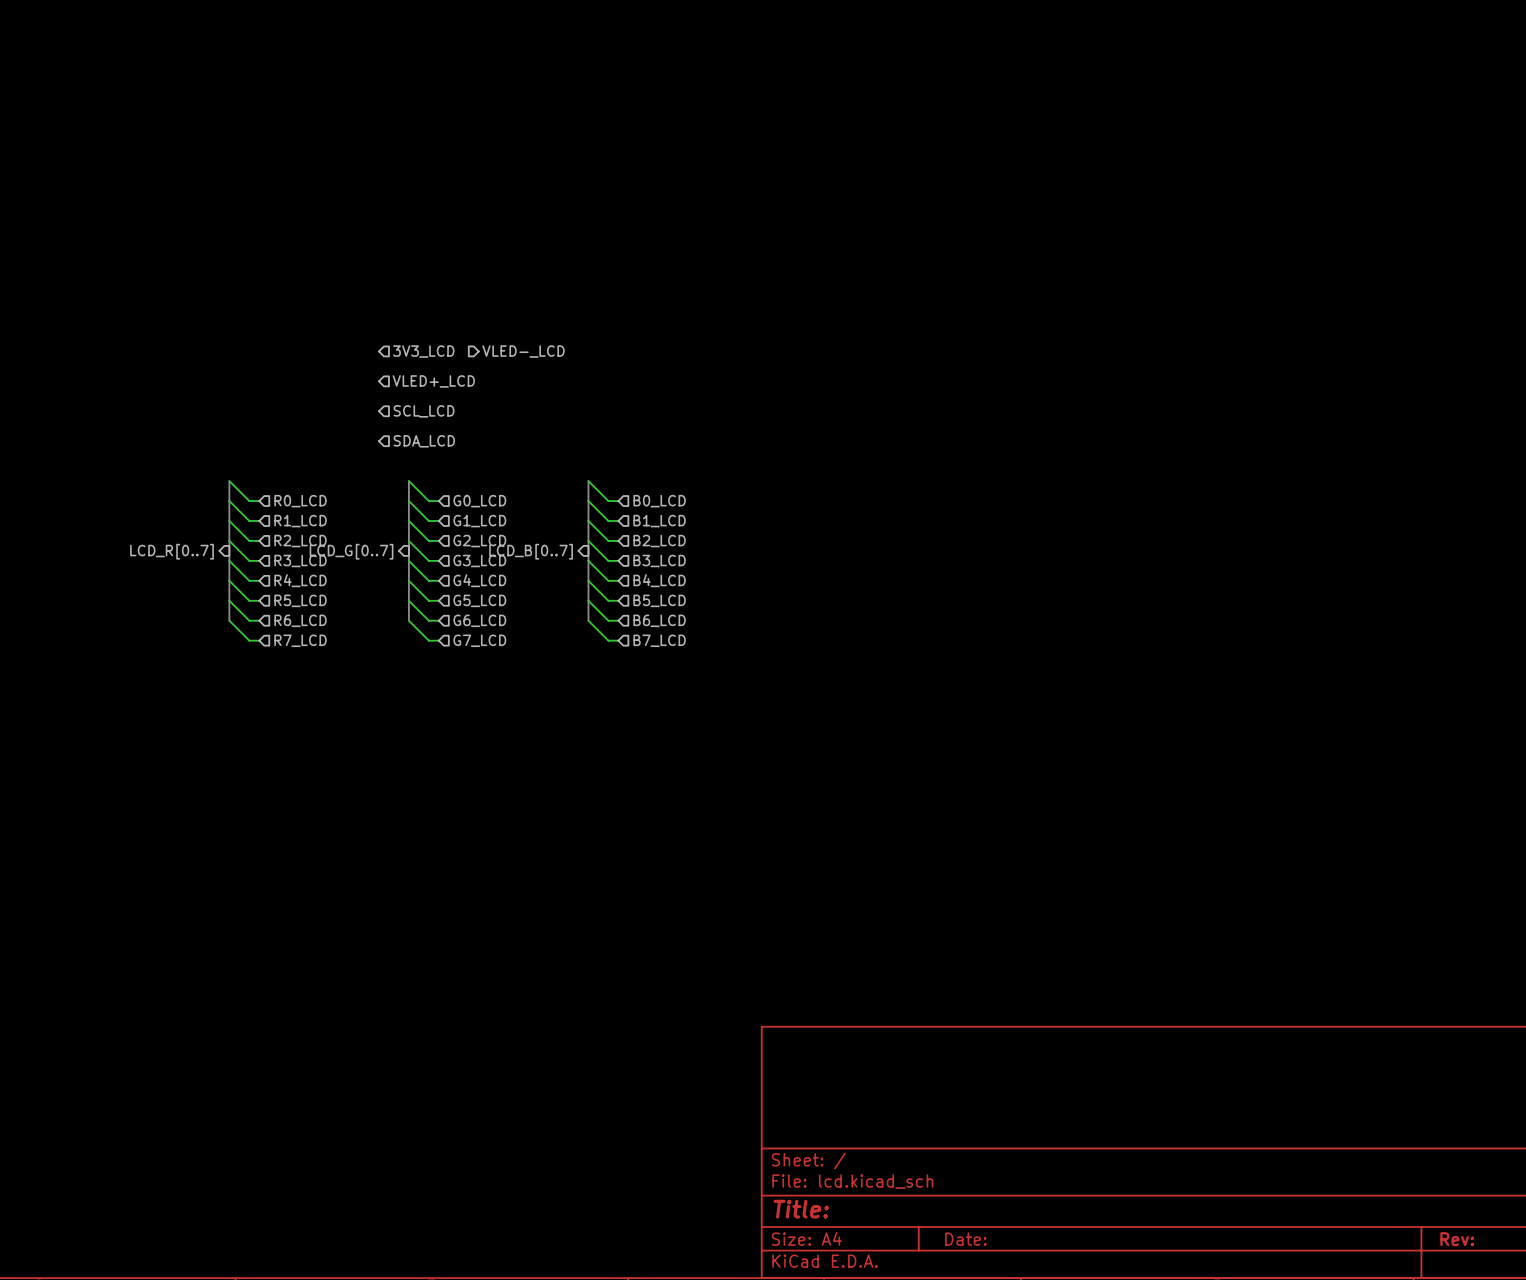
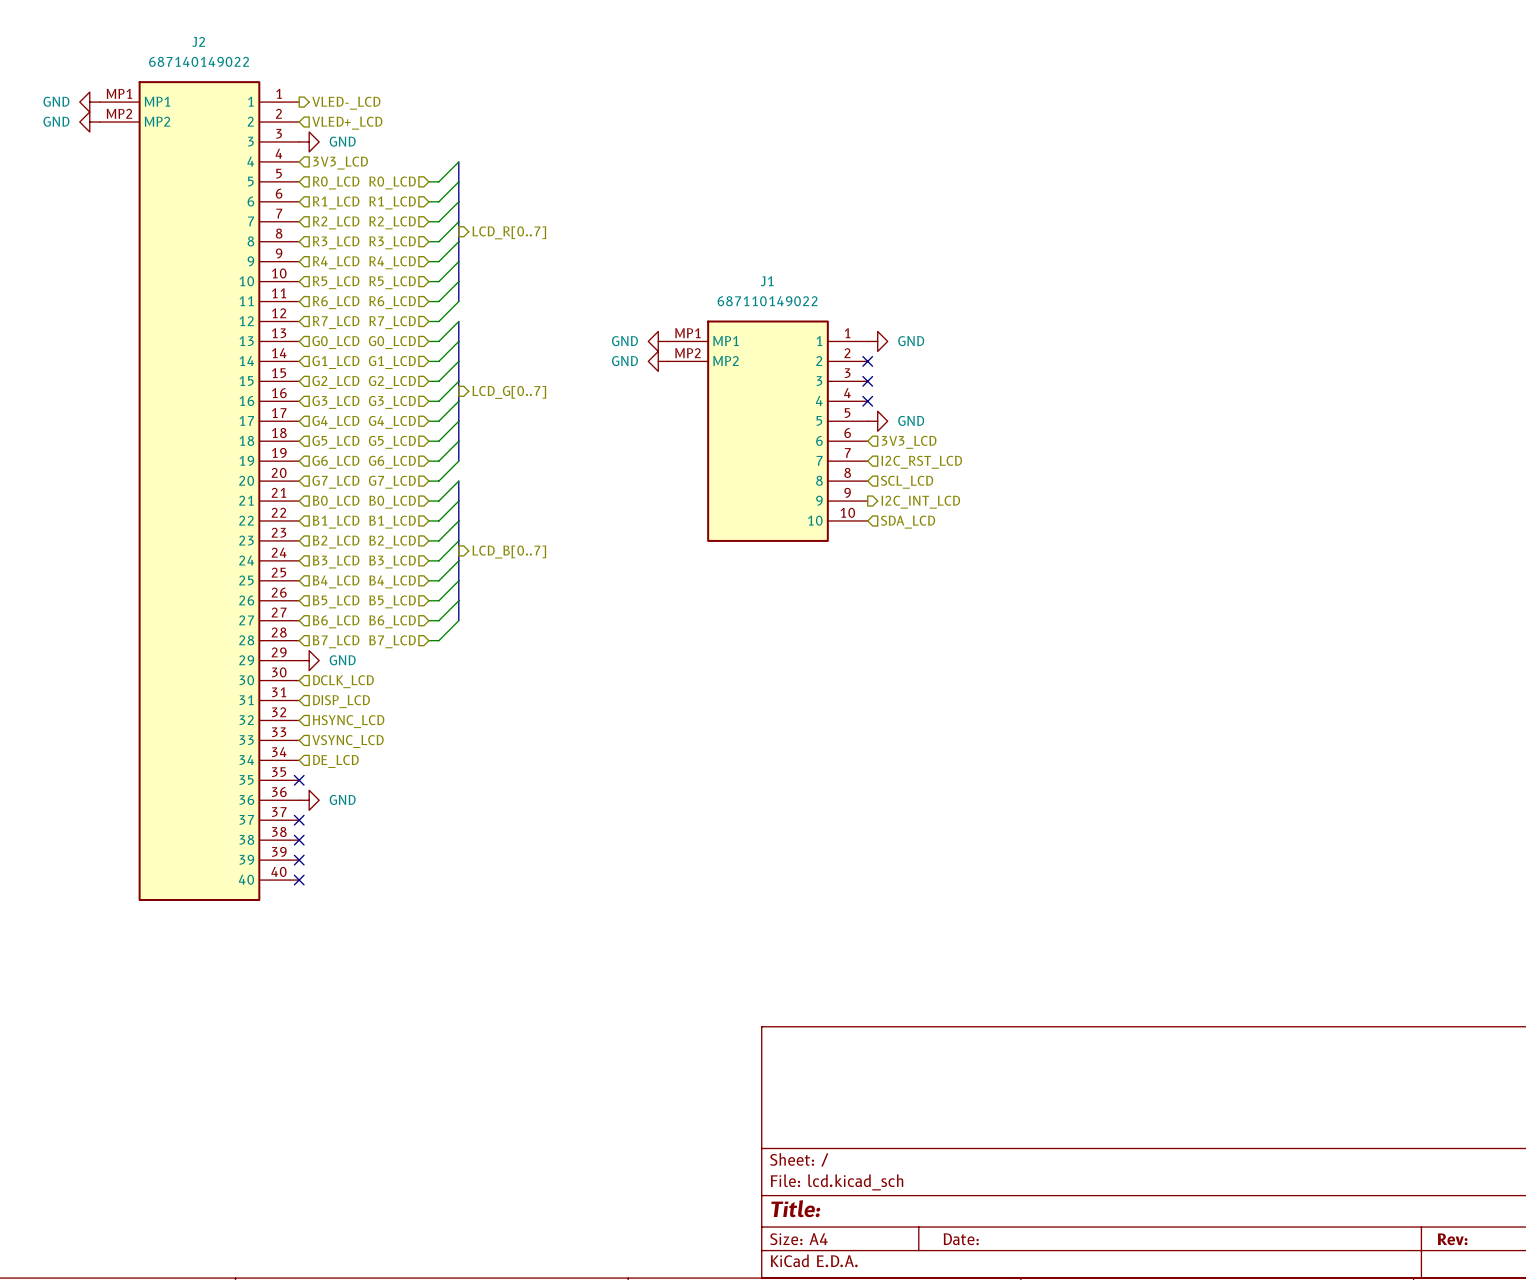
power symbol: none -> GND (89, 102)
hierarchical label: none -> VLED-_LCD (346, 103)
power symbol: none -> GND (89, 122)
hierarchical label: none -> VLED+_LCD (347, 123)
power symbol: none -> GND (309, 141)
wire: none -> (458, 161) (438, 181) (428, 181)
bus: none -> (458, 161) (458, 301)
hierarchical label: none -> 3V3_LCD (340, 163)
hierarchical label: none -> R0_LCD (336, 182)
hierarchical label: none -> R0_LCD (392, 182)
wire: none -> (458, 181) (438, 201) (428, 201)
hierarchical label: none -> R1_LCD (336, 202)
hierarchical label: none -> R1_LCD (392, 202)
wire: none -> (458, 201) (438, 221) (428, 221)
hierarchical label: none -> R2_LCD (336, 222)
hierarchical label: none -> R2_LCD (392, 222)
wire: none -> (458, 221) (438, 241) (428, 241)
hierarchical label: none -> LCD_R[0..7] (509, 232)
hierarchical label: none -> R3_LCD (336, 242)
hierarchical label: none -> R3_LCD (392, 242)
wire: none -> (458, 241) (438, 261) (428, 261)
hierarchical label: none -> R4_LCD (336, 262)
hierarchical label: none -> R4_LCD (392, 262)
wire: none -> (458, 261) (438, 281) (428, 281)
hierarchical label: none -> R5_LCD (336, 282)
hierarchical label: none -> R5_LCD (392, 282)
wire: none -> (458, 281) (438, 301) (428, 301)
hierarchical label: none -> R6_LCD (336, 302)
hierarchical label: none -> R6_LCD (392, 302)
wire: none -> (458, 301) (438, 321) (428, 321)
hierarchical label: none -> R7_LCD (336, 322)
hierarchical label: none -> R7_LCD (392, 322)
wire: none -> (458, 321) (438, 341) (428, 341)
bus: none -> (458, 321) (458, 461)
hierarchical label: none -> G0_LCD (335, 342)
hierarchical label: none -> G0_LCD (392, 342)
wire: none -> (458, 341) (438, 361) (428, 361)
power symbol: none -> GND (658, 341)
power symbol: none -> GND (877, 341)
hierarchical label: 3V3_LCD (423, 351) -> none
hierarchical label: VLED-_LCD (523, 351) -> none
hierarchical label: none -> G1_LCD (335, 362)
hierarchical label: none -> G1_LCD (392, 362)
wire: none -> (458, 361) (438, 381) (428, 381)
power symbol: none -> GND (658, 361)
no-connect mark: none -> (867, 361)
hierarchical label: none -> G2_LCD (335, 382)
hierarchical label: none -> G2_LCD (392, 382)
hierarchical label: VLED+_LCD (433, 381) -> none
wire: none -> (458, 381) (438, 401) (428, 401)
no-connect mark: none -> (867, 381)
hierarchical label: none -> G3_LCD (335, 402)
hierarchical label: none -> G3_LCD (392, 402)
wire: none -> (458, 401) (438, 421) (428, 421)
no-connect mark: none -> (867, 401)
hierarchical label: SCL_LCD (424, 411) -> none
hierarchical label: none -> G4_LCD (335, 422)
hierarchical label: none -> G4_LCD (392, 422)
wire: none -> (458, 421) (438, 441) (428, 441)
power symbol: none -> GND (877, 421)
J1: none -> 687110149022 (767, 431)
hierarchical label: none -> G5_LCD (335, 442)
hierarchical label: none -> G5_LCD (392, 442)
hierarchical label: SDA_LCD (424, 441) -> none
wire: none -> (458, 441) (438, 461) (428, 461)
hierarchical label: none -> 3V3_LCD (909, 442)
hierarchical label: none -> G6_LCD (335, 462)
hierarchical label: none -> G6_LCD (392, 462)
wire: none -> (458, 461) (438, 481) (428, 481)
hierarchical label: none -> I2C_RST_LCD (921, 462)
bus: (229, 481) (229, 620) -> none
hierarchical label: none -> G7_LCD (335, 482)
hierarchical label: none -> G7_LCD (392, 482)
wire: (408, 481) (428, 501) -> none
bus: (408, 481) (408, 620) -> (458, 481) (458, 620)
wire: none -> (458, 481) (438, 501)
wire: (588, 481) (608, 501) (618, 501) -> none
bus: (588, 481) (588, 620) -> none
hierarchical label: none -> SCL_LCD (907, 482)
J2: none -> 687140149022 (199, 491)
hierarchical label: R0_LCD (300, 501) -> none
hierarchical label: none -> B0_LCD (336, 502)
hierarchical label: none -> B0_LCD (392, 502)
wire: (408, 501) (428, 520) -> none
wire: none -> (458, 501) (438, 520)
hierarchical label: G0_LCD (479, 501) -> none
wire: (588, 501) (608, 520) (618, 520) -> none
hierarchical label: B0_LCD (659, 501) -> none
hierarchical label: none -> I2C_INT_LCD (920, 502)
wire: (408, 520) (428, 540) -> none
wire: none -> (458, 520) (438, 540)
wire: (588, 520) (608, 540) (618, 540) -> none
hierarchical label: R1_LCD (300, 521) -> none
hierarchical label: none -> B1_LCD (336, 522)
hierarchical label: none -> B1_LCD (392, 522)
hierarchical label: G1_LCD (479, 521) -> none
hierarchical label: B1_LCD (659, 521) -> none
hierarchical label: none -> SDA_LCD (908, 522)
wire: (408, 540) (428, 560) -> none
wire: none -> (458, 540) (438, 560)
wire: (588, 540) (608, 560) (618, 560) -> none
hierarchical label: R2_LCD (300, 541) -> none
hierarchical label: none -> B2_LCD (336, 542)
hierarchical label: none -> B2_LCD (392, 542)
hierarchical label: G2_LCD (479, 541) -> none
hierarchical label: B2_LCD (659, 541) -> none
hierarchical label: LCD_R[0..7] (172, 551) -> none
hierarchical label rotation: 0° (351, 551) -> 180° (509, 392)
hierarchical label position: LCD_G[0..7] (351, 551) -> LCD_G[0..7] (509, 392)
hierarchical label rotation: 0° (531, 551) -> 180° (509, 552)
hierarchical label: R3_LCD (300, 560) -> none
hierarchical label: none -> B3_LCD (336, 562)
hierarchical label: none -> B3_LCD (392, 562)
wire: (408, 560) (428, 580) -> none
wire: none -> (458, 560) (438, 580)
hierarchical label: G3_LCD (479, 560) -> none
wire: (588, 560) (608, 580) (618, 580) -> none
hierarchical label: B3_LCD (659, 560) -> none
hierarchical label: R4_LCD (300, 580) -> none
hierarchical label: none -> B4_LCD (336, 581)
hierarchical label: none -> B4_LCD (392, 581)
wire: (408, 580) (428, 600) -> none
wire: none -> (458, 580) (438, 600)
hierarchical label: G4_LCD (479, 580) -> none
wire: (588, 580) (608, 600) (618, 600) -> none
hierarchical label: B4_LCD (659, 580) -> none
hierarchical label: R5_LCD (300, 600) -> none
hierarchical label: none -> B5_LCD (336, 601)
hierarchical label: none -> B5_LCD (392, 601)
wire: (408, 600) (428, 620) -> none
wire: none -> (458, 600) (438, 620)
hierarchical label: G5_LCD (479, 600) -> none
wire: (588, 600) (608, 620) (618, 620) -> none
hierarchical label: B5_LCD (659, 600) -> none
hierarchical label: R6_LCD (300, 620) -> none
hierarchical label: none -> B6_LCD (336, 621)
hierarchical label: none -> B6_LCD (392, 621)
wire: (408, 620) (428, 640) -> none
wire: none -> (458, 620) (438, 640)
hierarchical label: G6_LCD (479, 620) -> none
wire: (588, 620) (608, 640) (618, 640) -> none
hierarchical label: B6_LCD (659, 620) -> none
hierarchical label: R7_LCD (300, 640) -> none
hierarchical label: none -> B7_LCD (336, 641)
hierarchical label: none -> B7_LCD (392, 641)
hierarchical label: G7_LCD (479, 640) -> none
hierarchical label: B7_LCD (659, 640) -> none
power symbol: none -> GND (309, 660)
hierarchical label: none -> DCLK_LCD (343, 681)
hierarchical label: none -> DISP_LCD (341, 701)
hierarchical label: none -> HSYNC_LCD (348, 721)
hierarchical label: none -> VSYNC_LCD (347, 741)
hierarchical label: none -> DE_LCD (335, 761)
no-connect mark: none -> (299, 780)
power symbol: none -> GND (309, 800)
no-connect mark: none -> (299, 820)
no-connect mark: none -> (299, 840)
no-connect mark: none -> (299, 860)
no-connect mark: none -> (299, 880)

